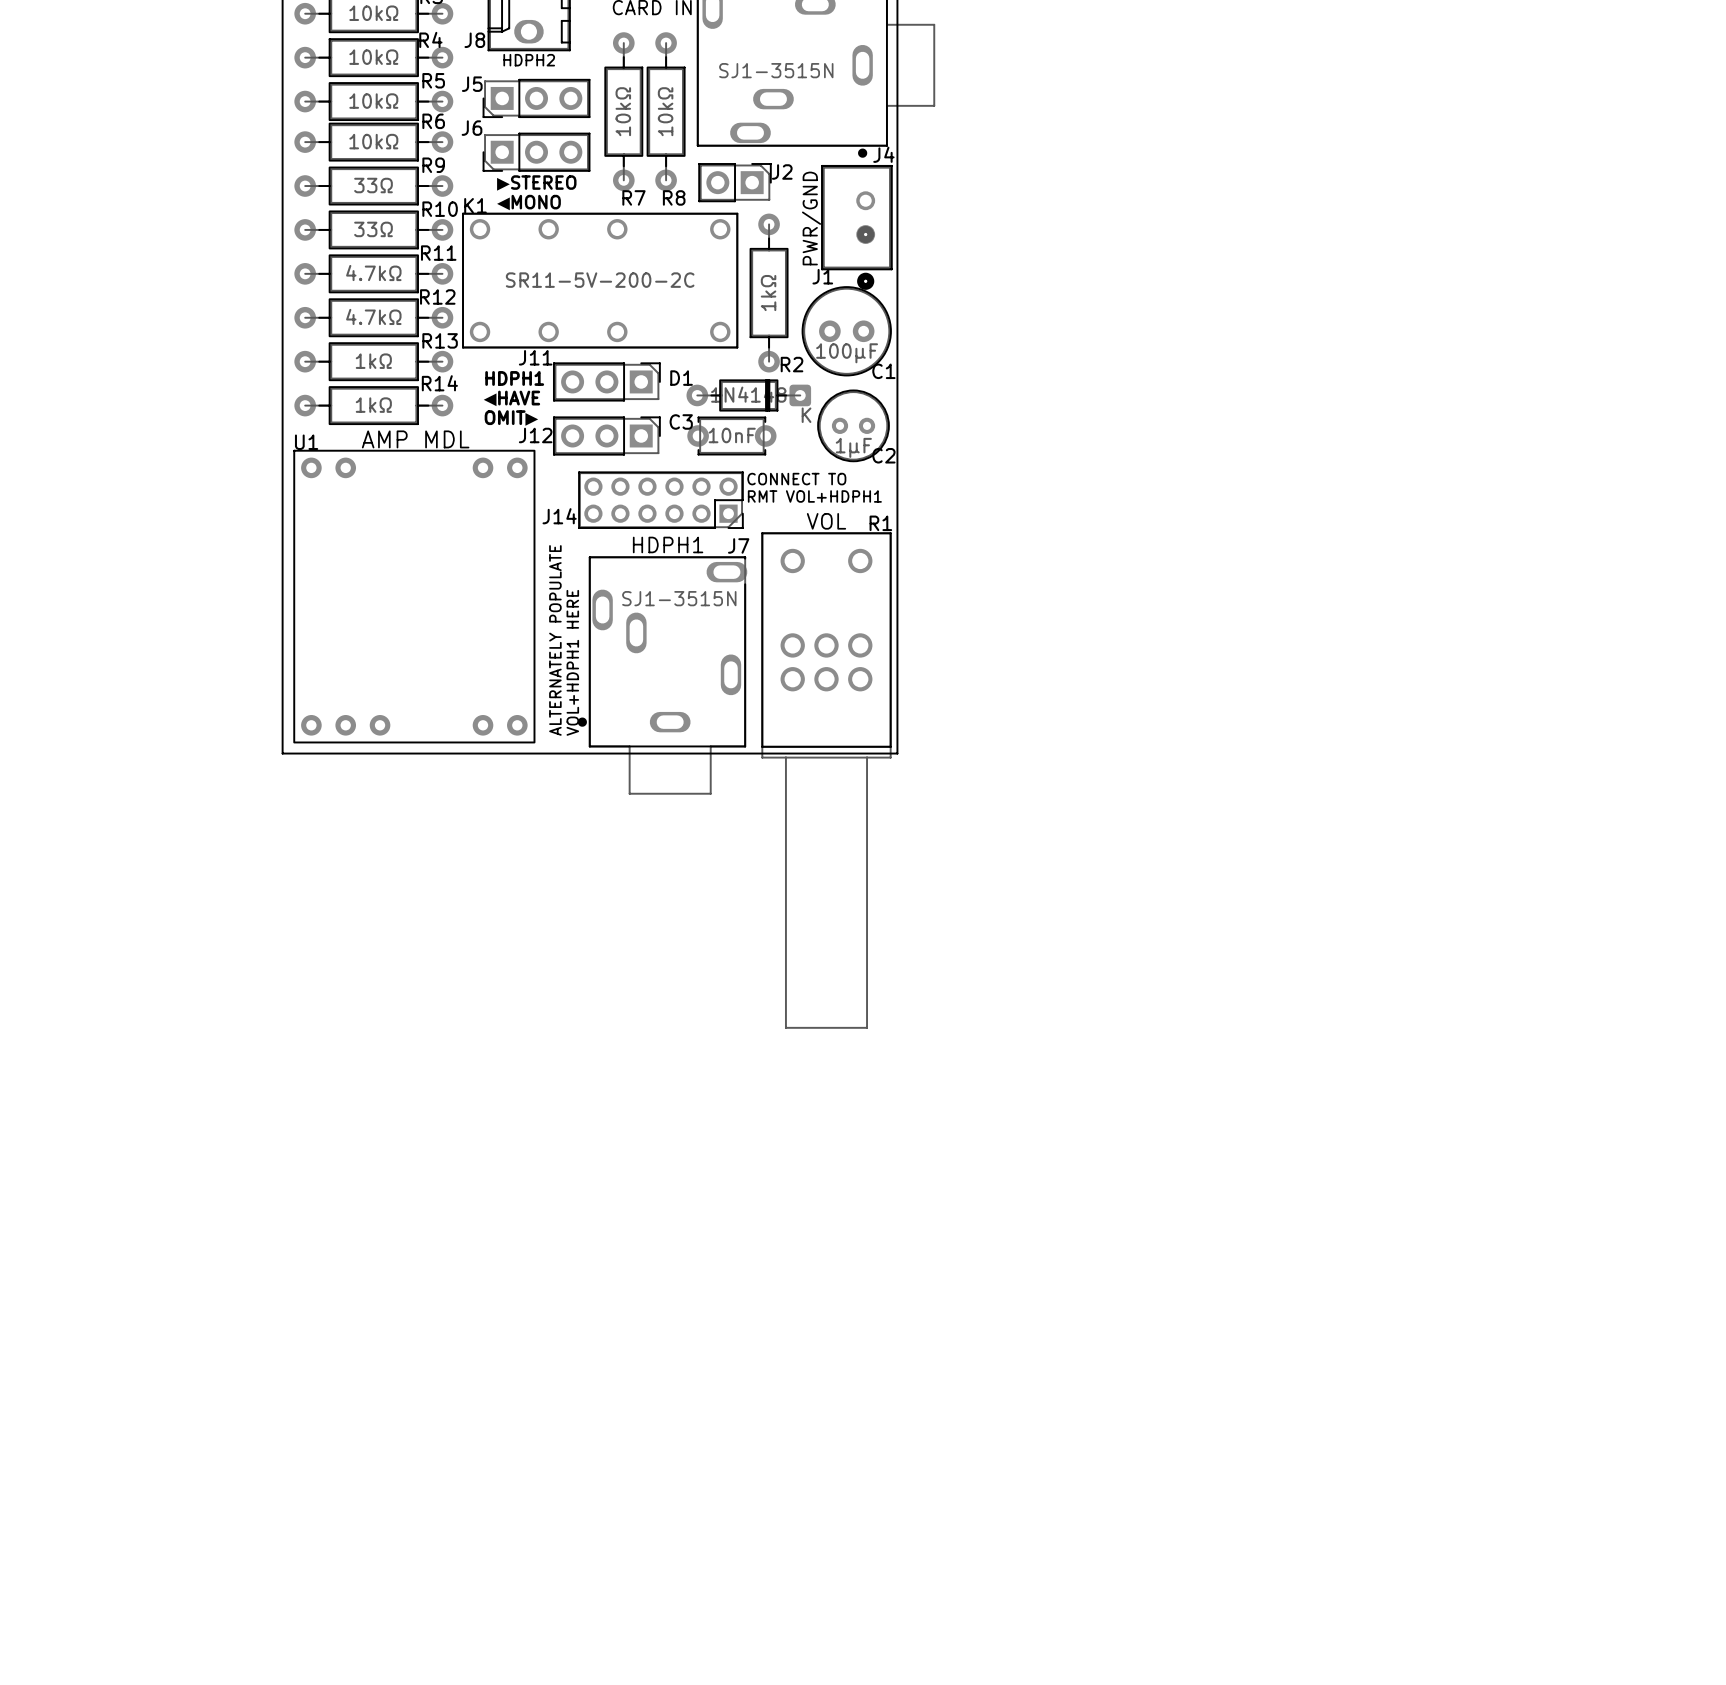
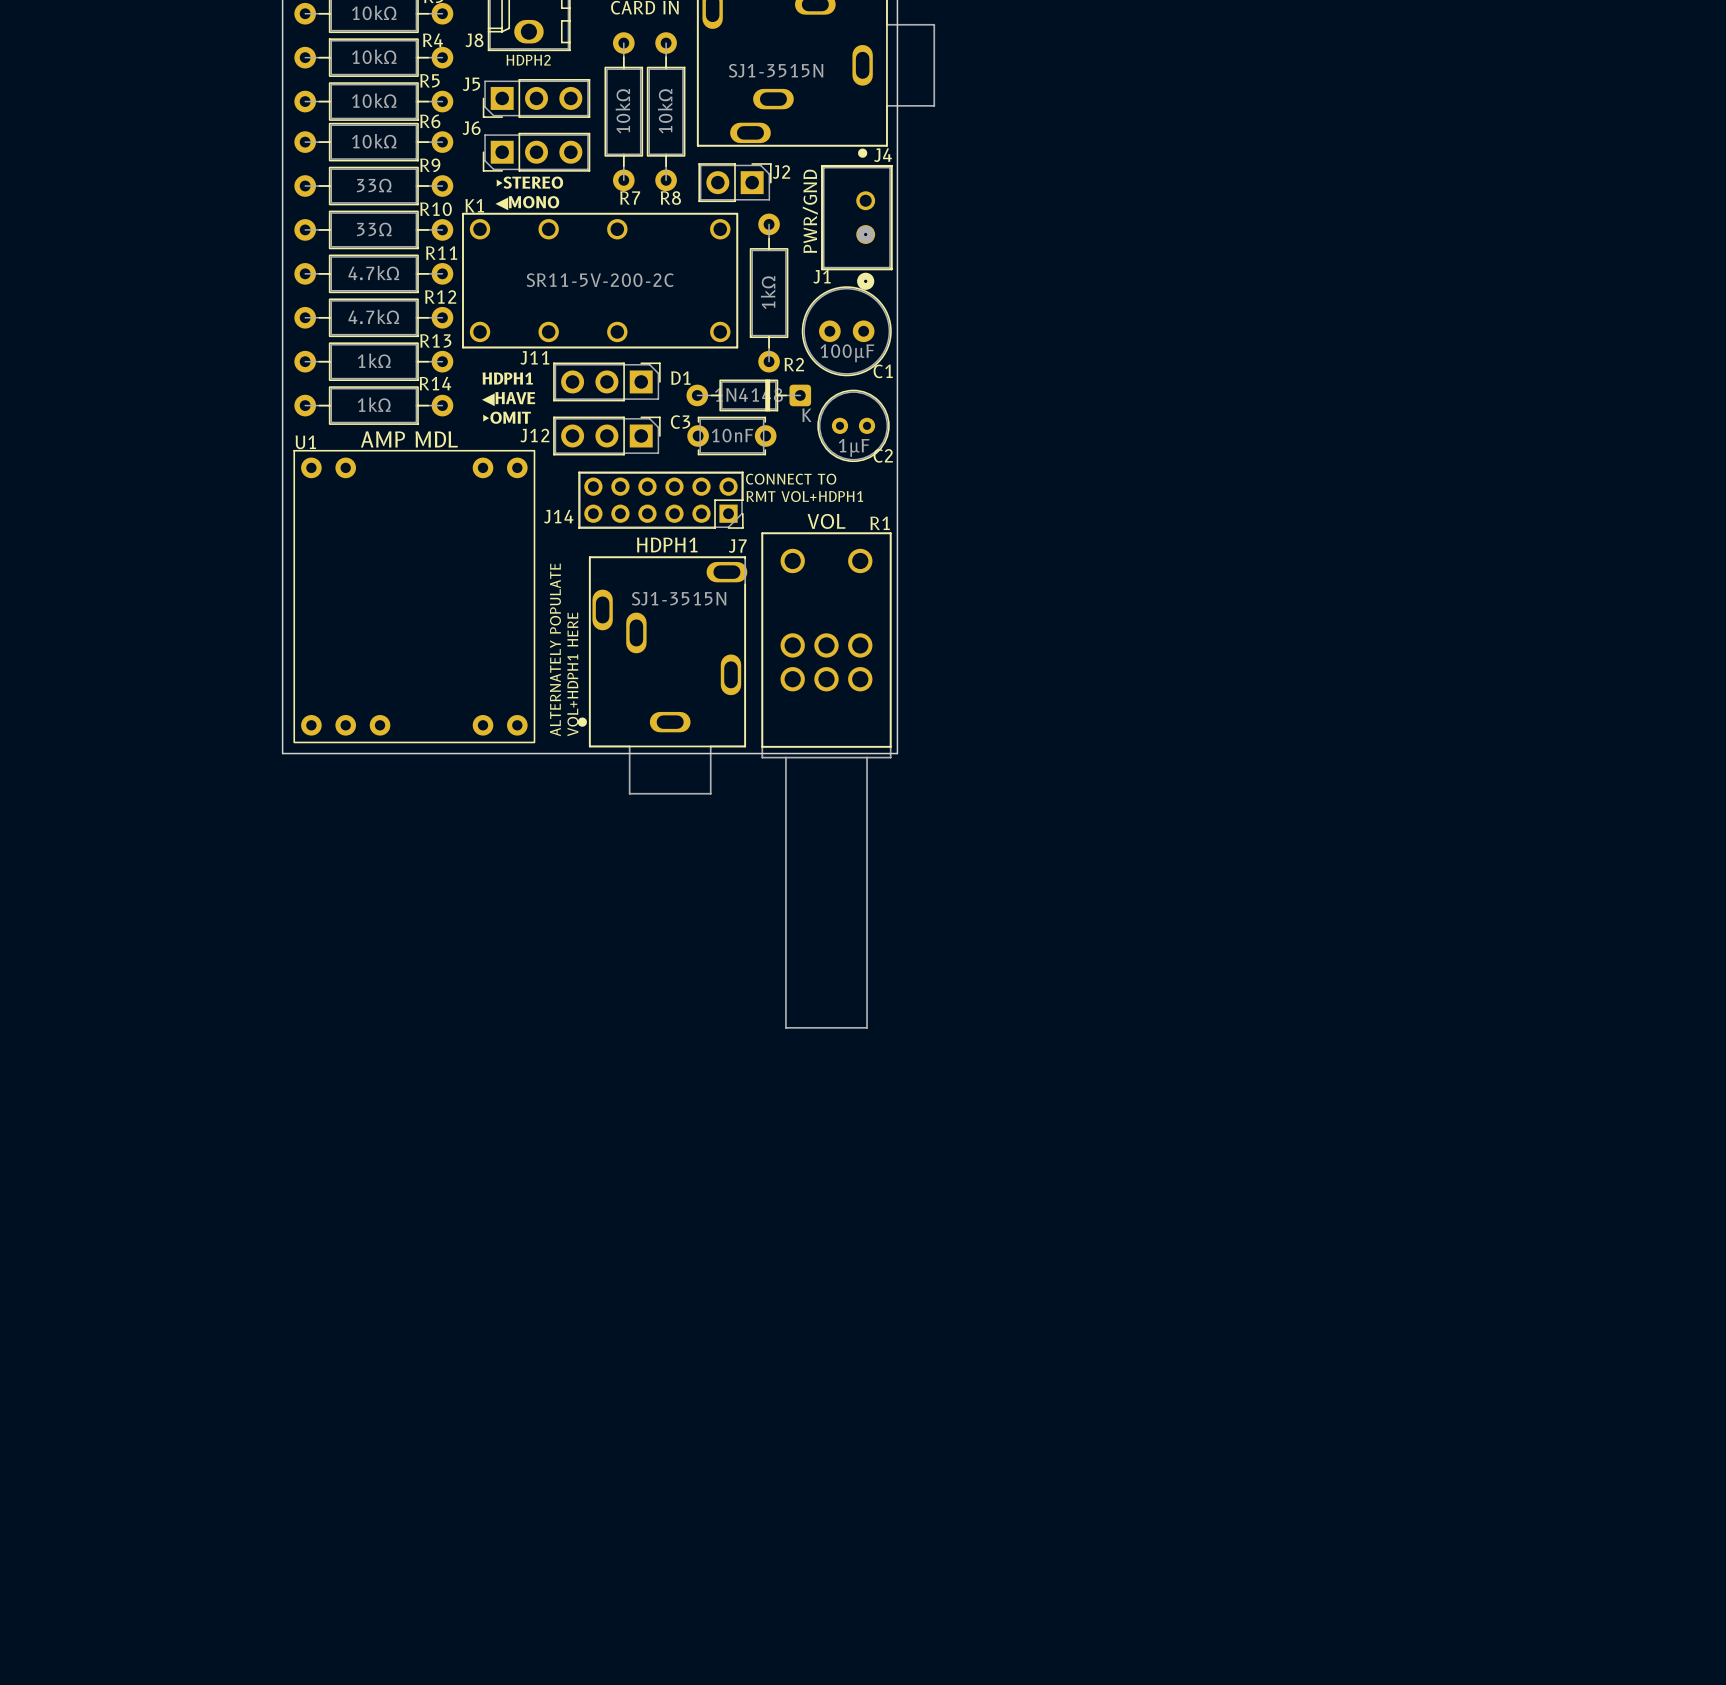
text: ︎OMIT▶ (512, 418) -> ︎▶OMIT (507, 417)

